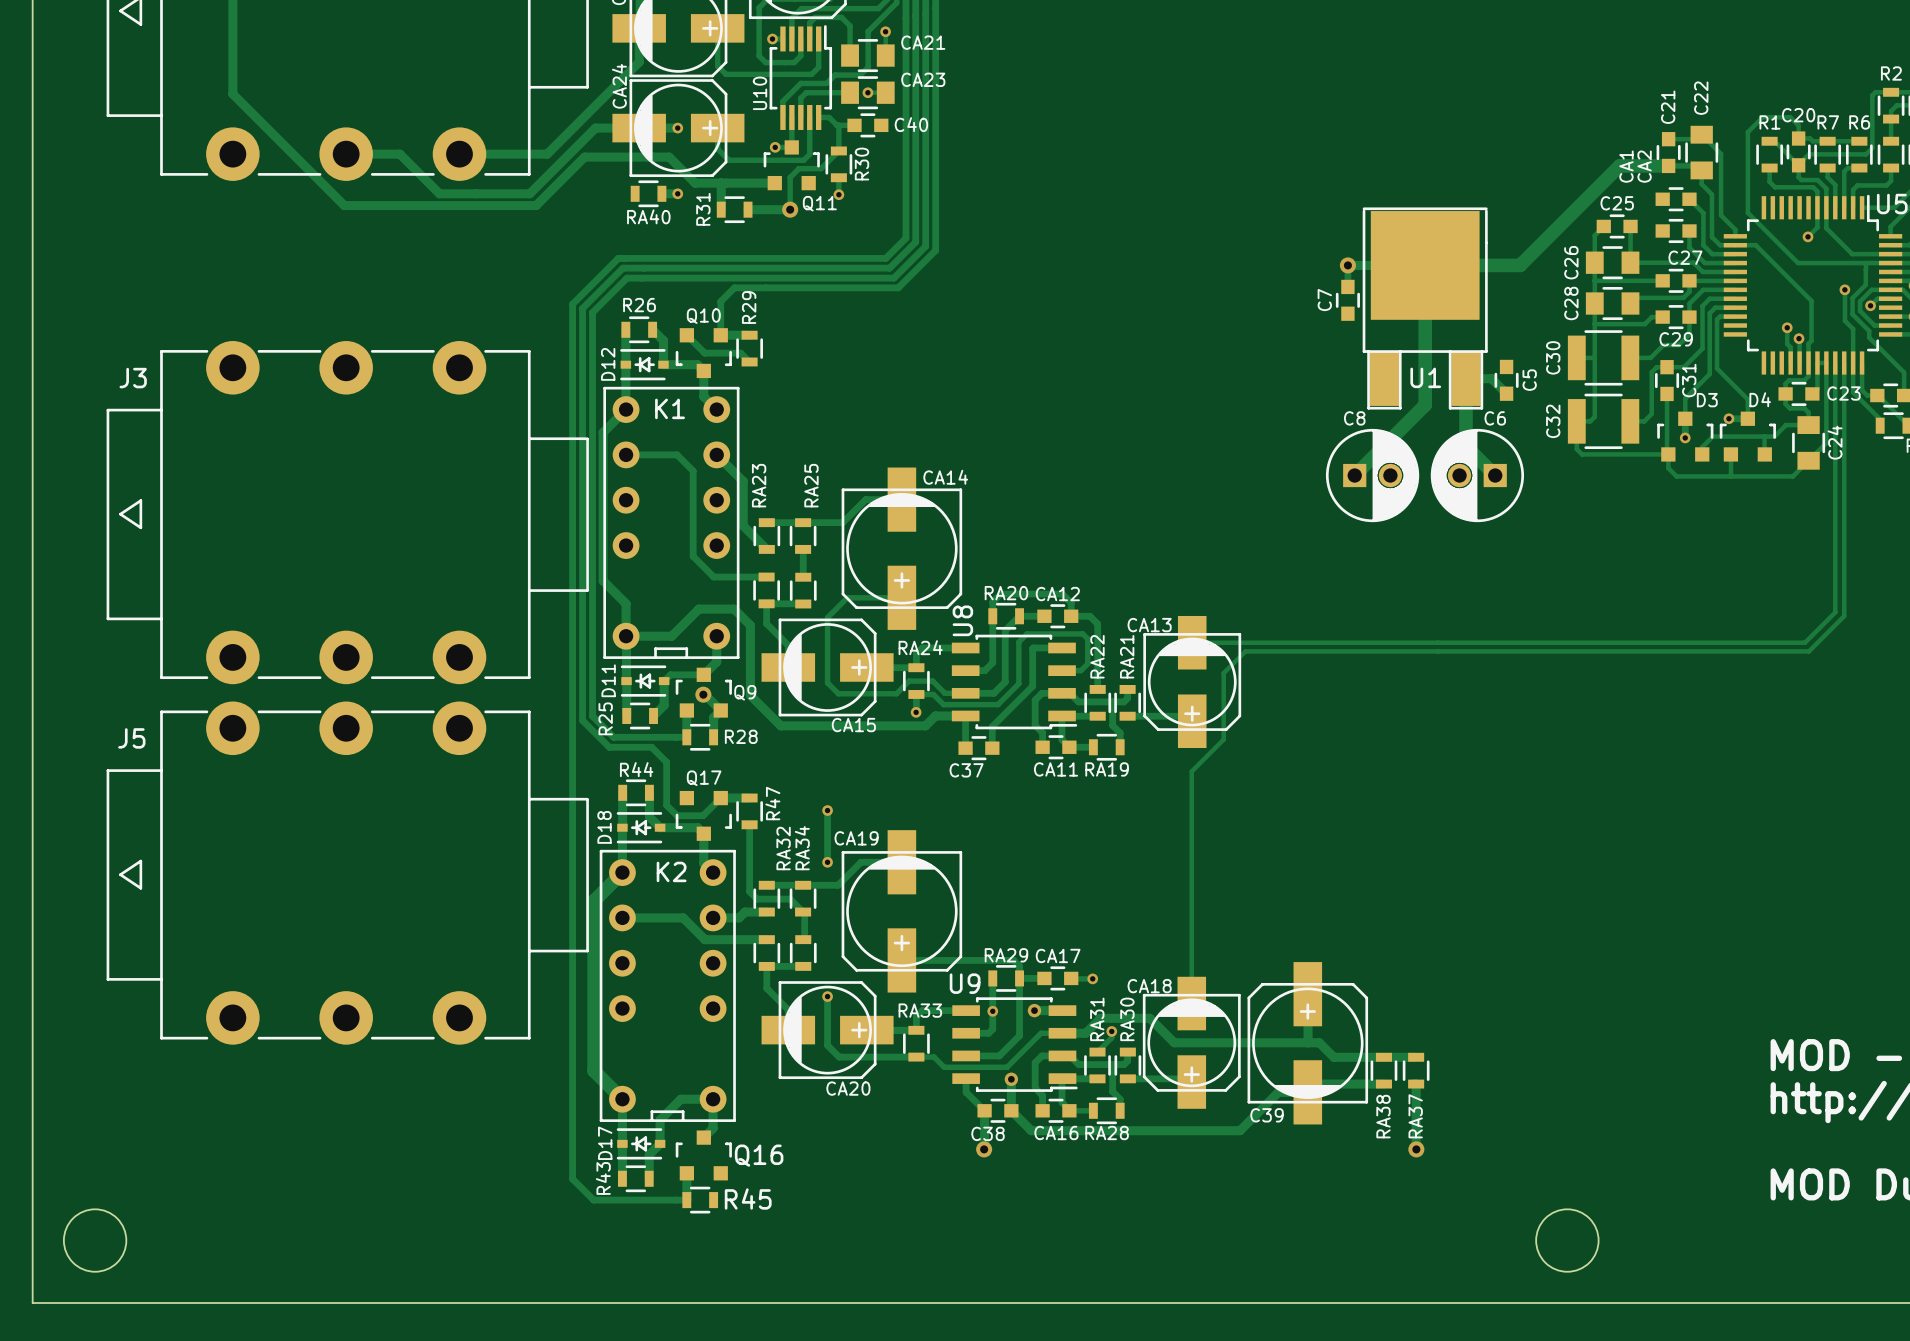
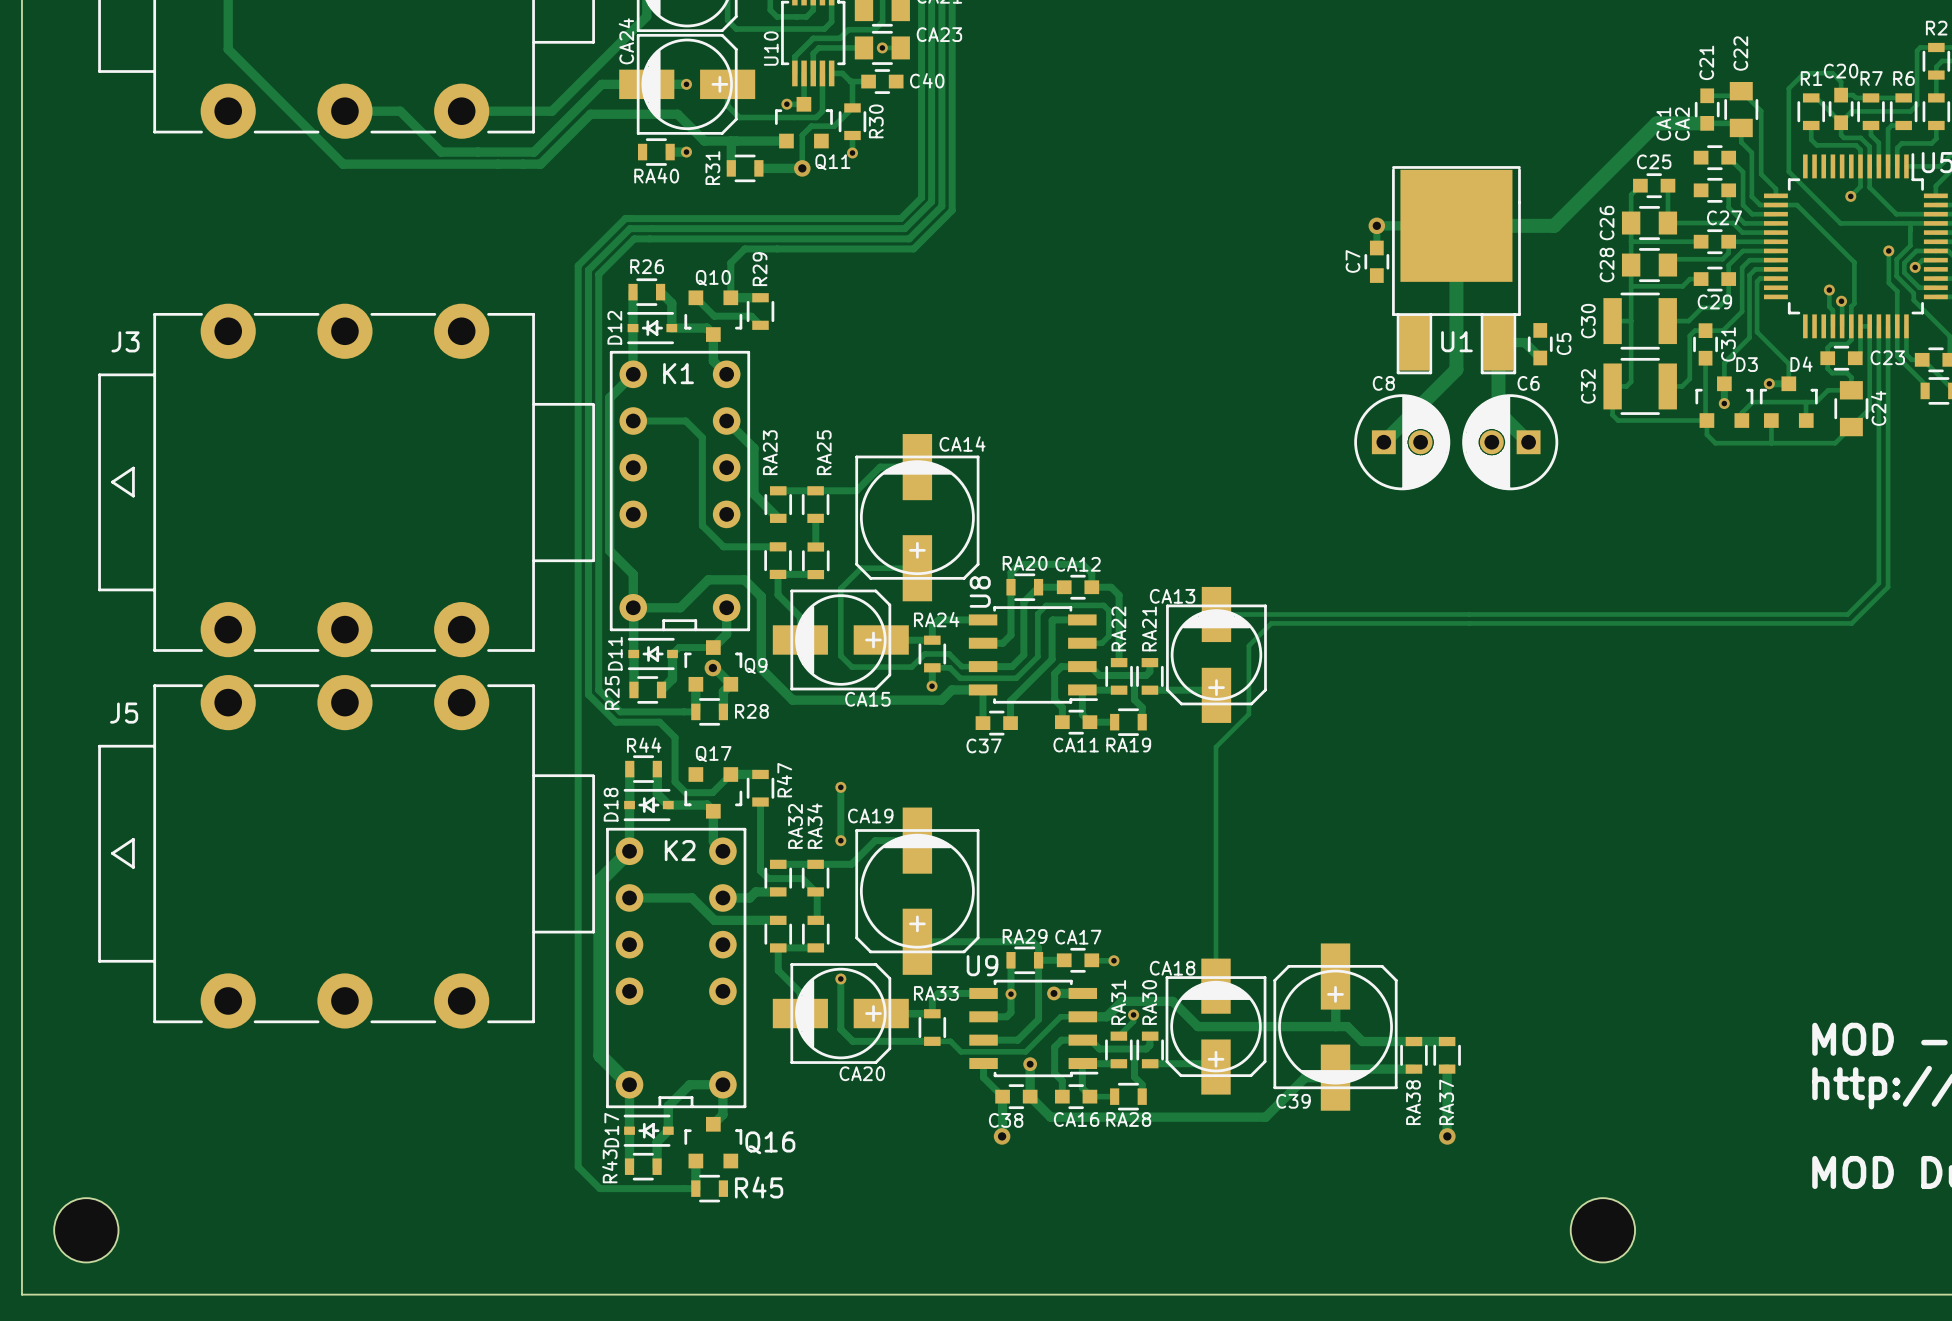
part: none -> (86, 1230)
part: none -> (1602, 1230)

